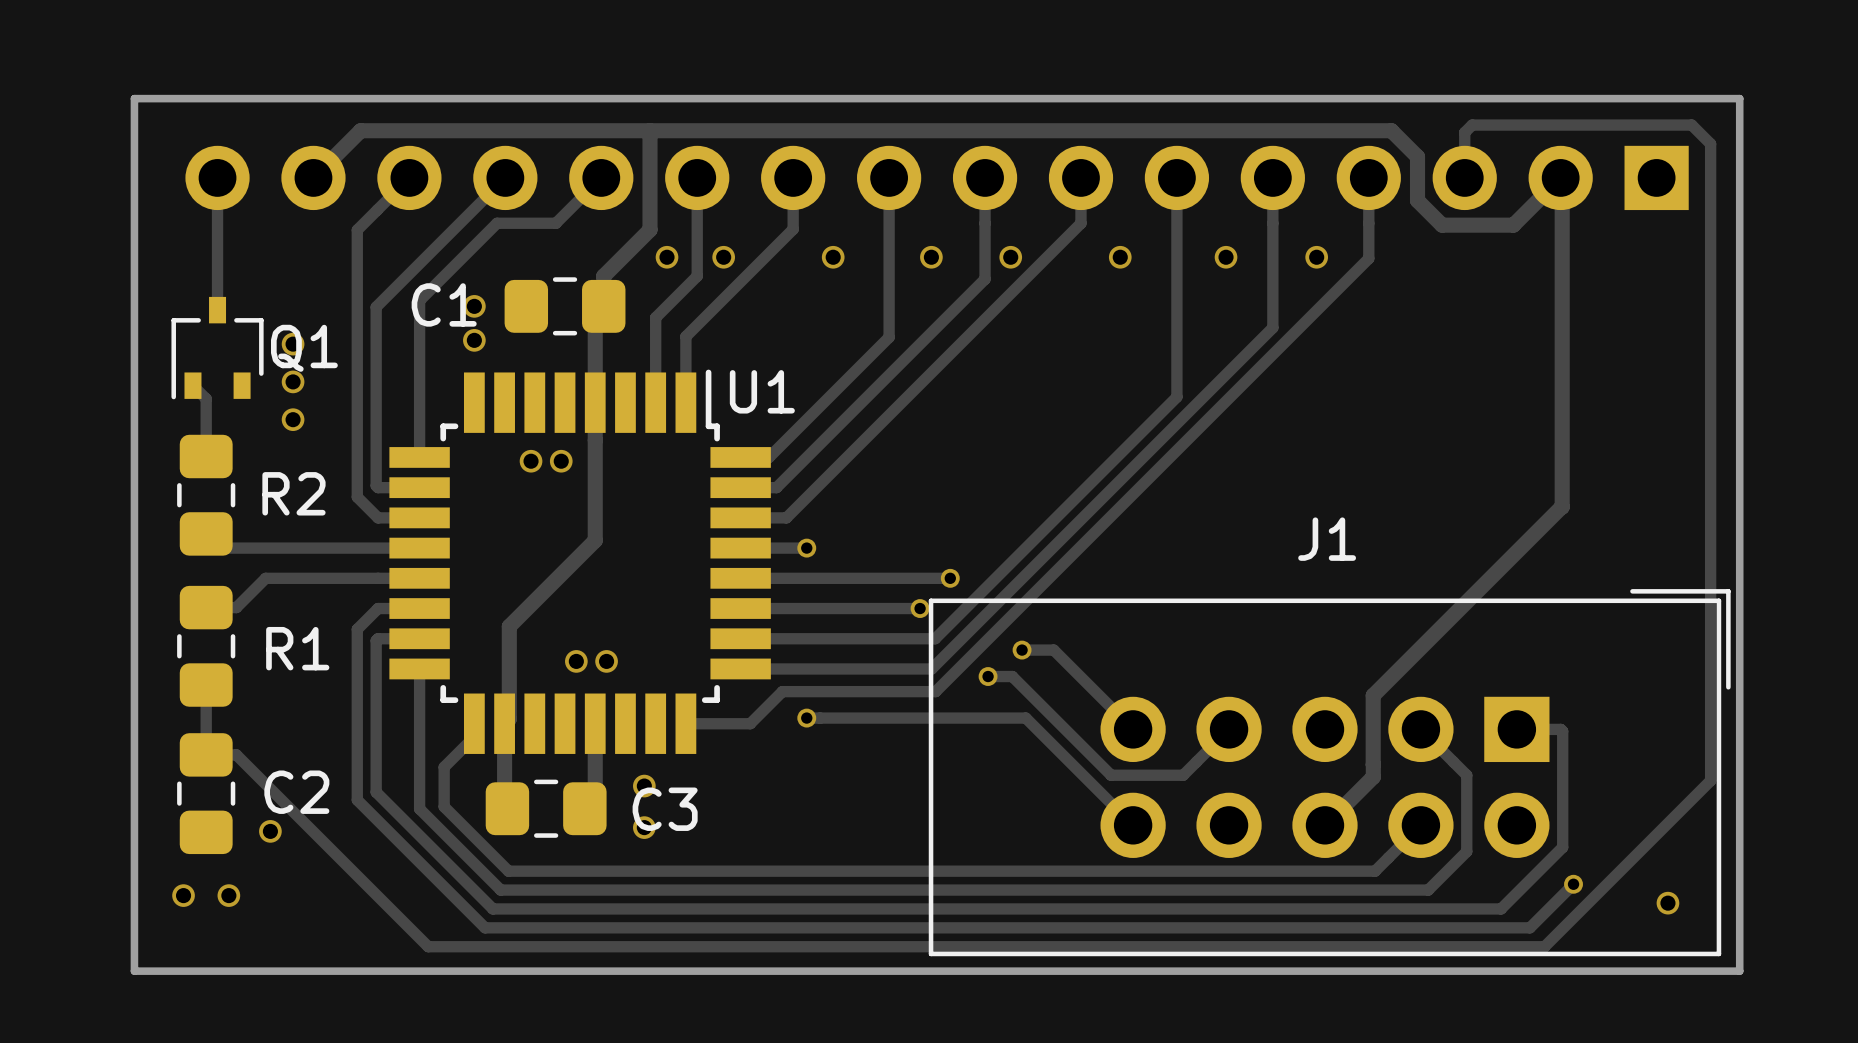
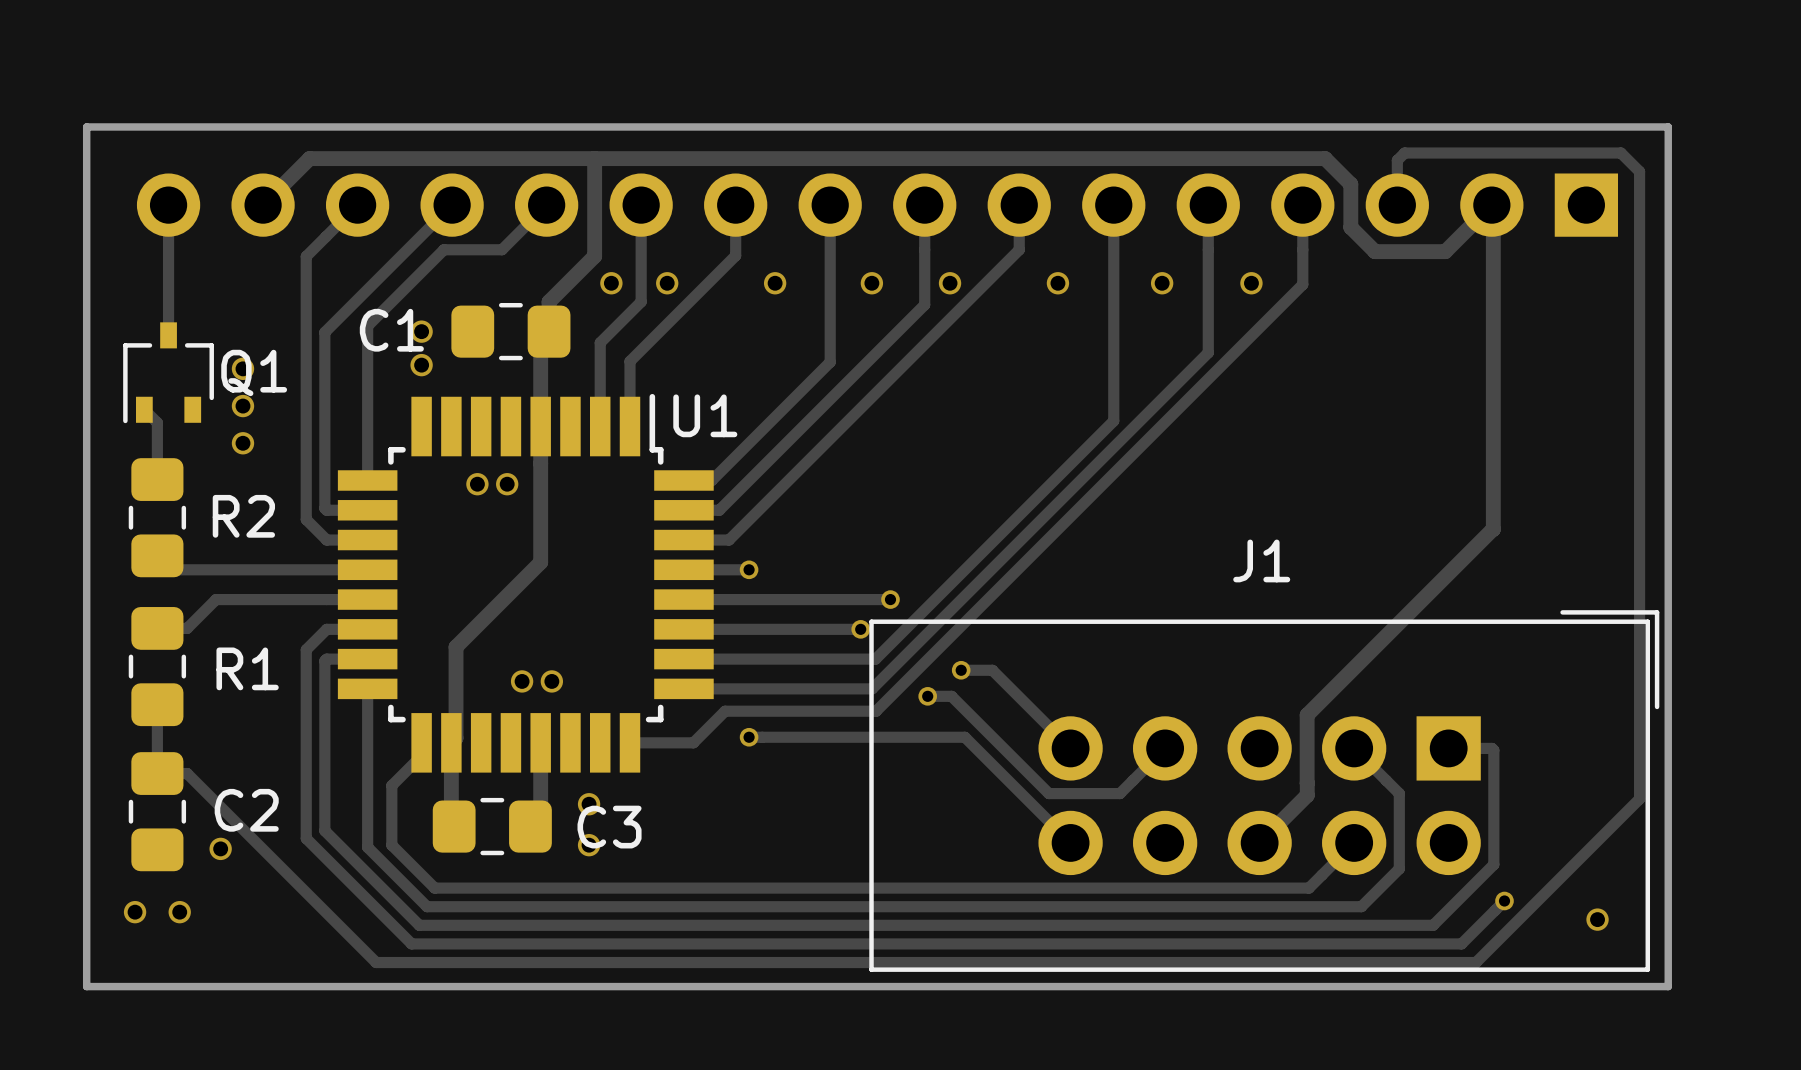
track: (376, 792) (492, 908) -> (324, 810) (324, 830) (419, 925) (439, 925)
track: (357, 800) (485, 927) -> (306, 818) (306, 838) (411, 943) (432, 943)
track: (444, 806) (508, 871) -> (391, 824) (391, 845) (434, 888) (455, 888)
track: (419, 808) (500, 890) -> (367, 826) (367, 847) (427, 906) (447, 906)

